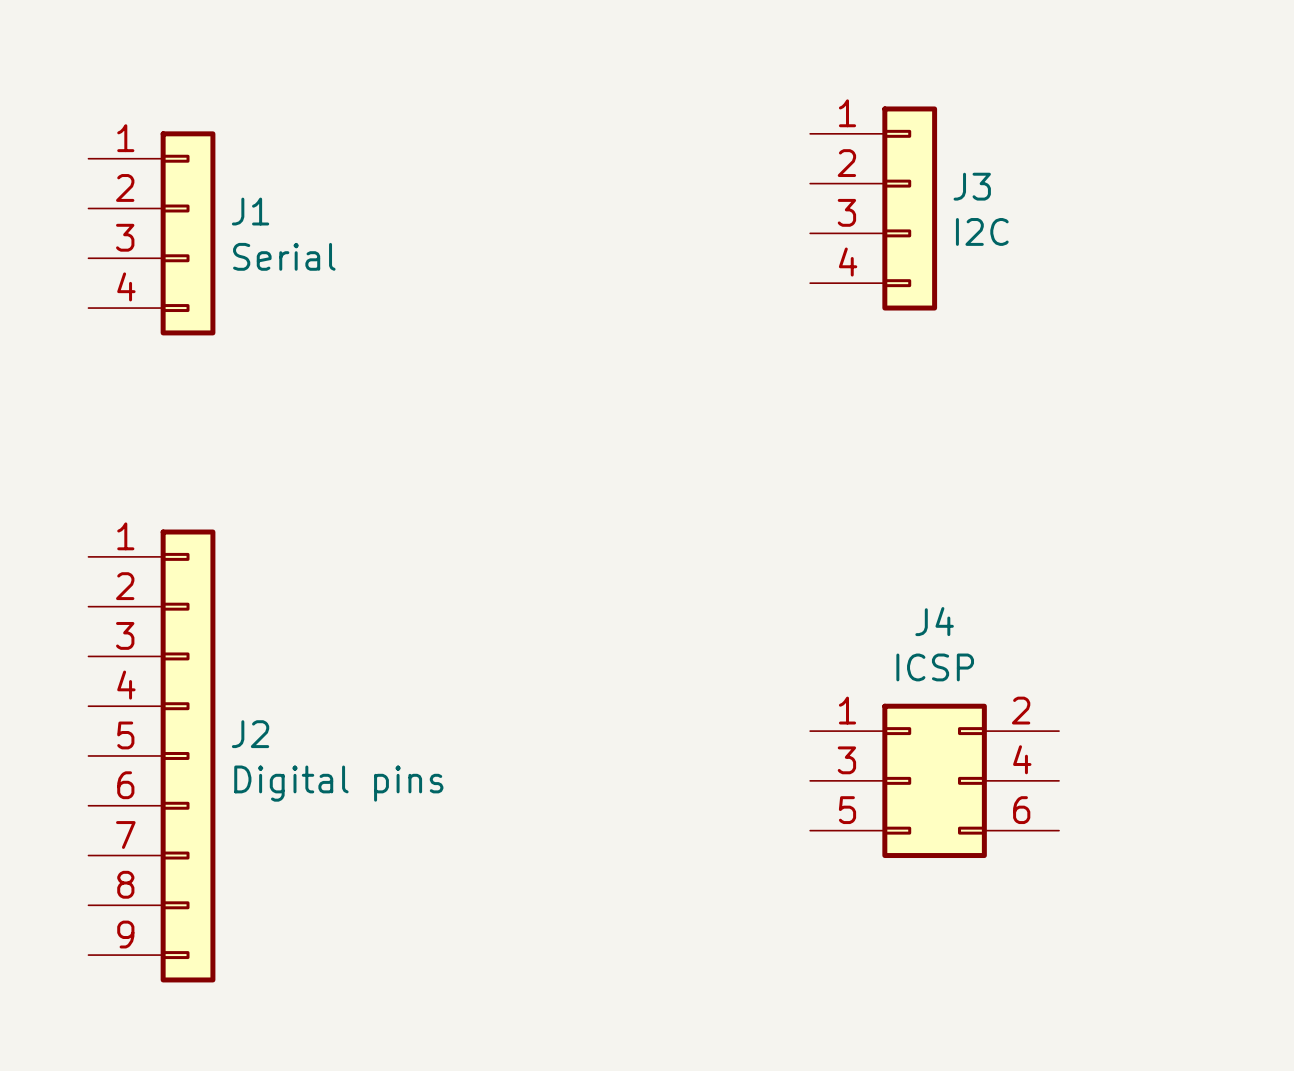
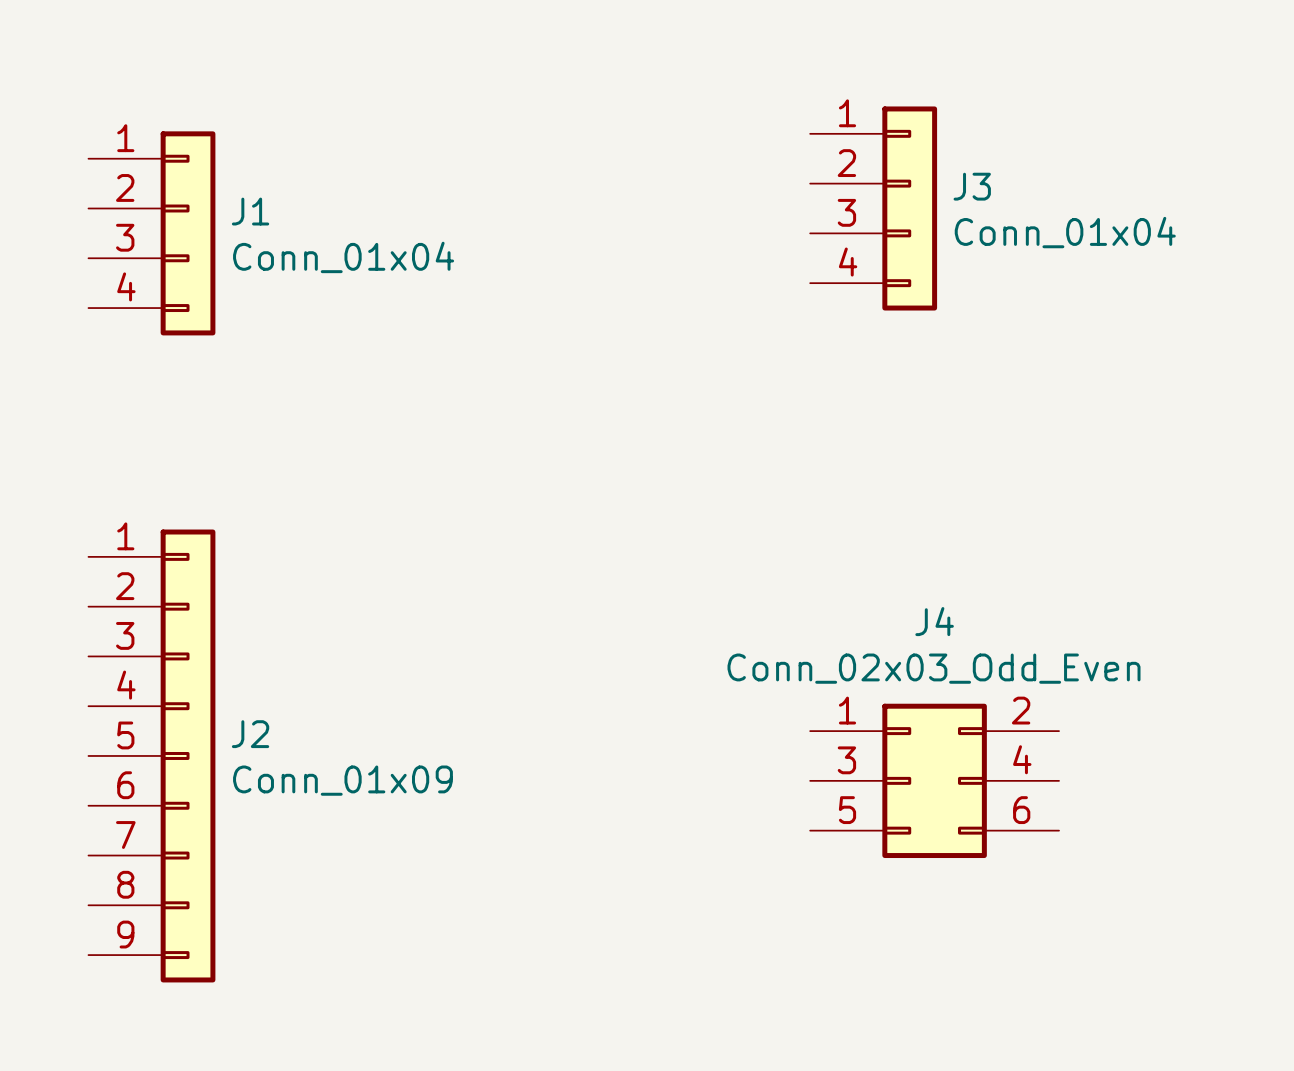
J3 value: I2C (982, 231) -> Conn_01x04 (1065, 232)
J1 value: Serial (284, 256) -> Conn_01x04 (343, 257)
J4 value: ICSP (935, 667) -> Conn_02x03_Odd_Even (934, 668)
J2 value: Digital pins (338, 783) -> Conn_01x09 (342, 780)

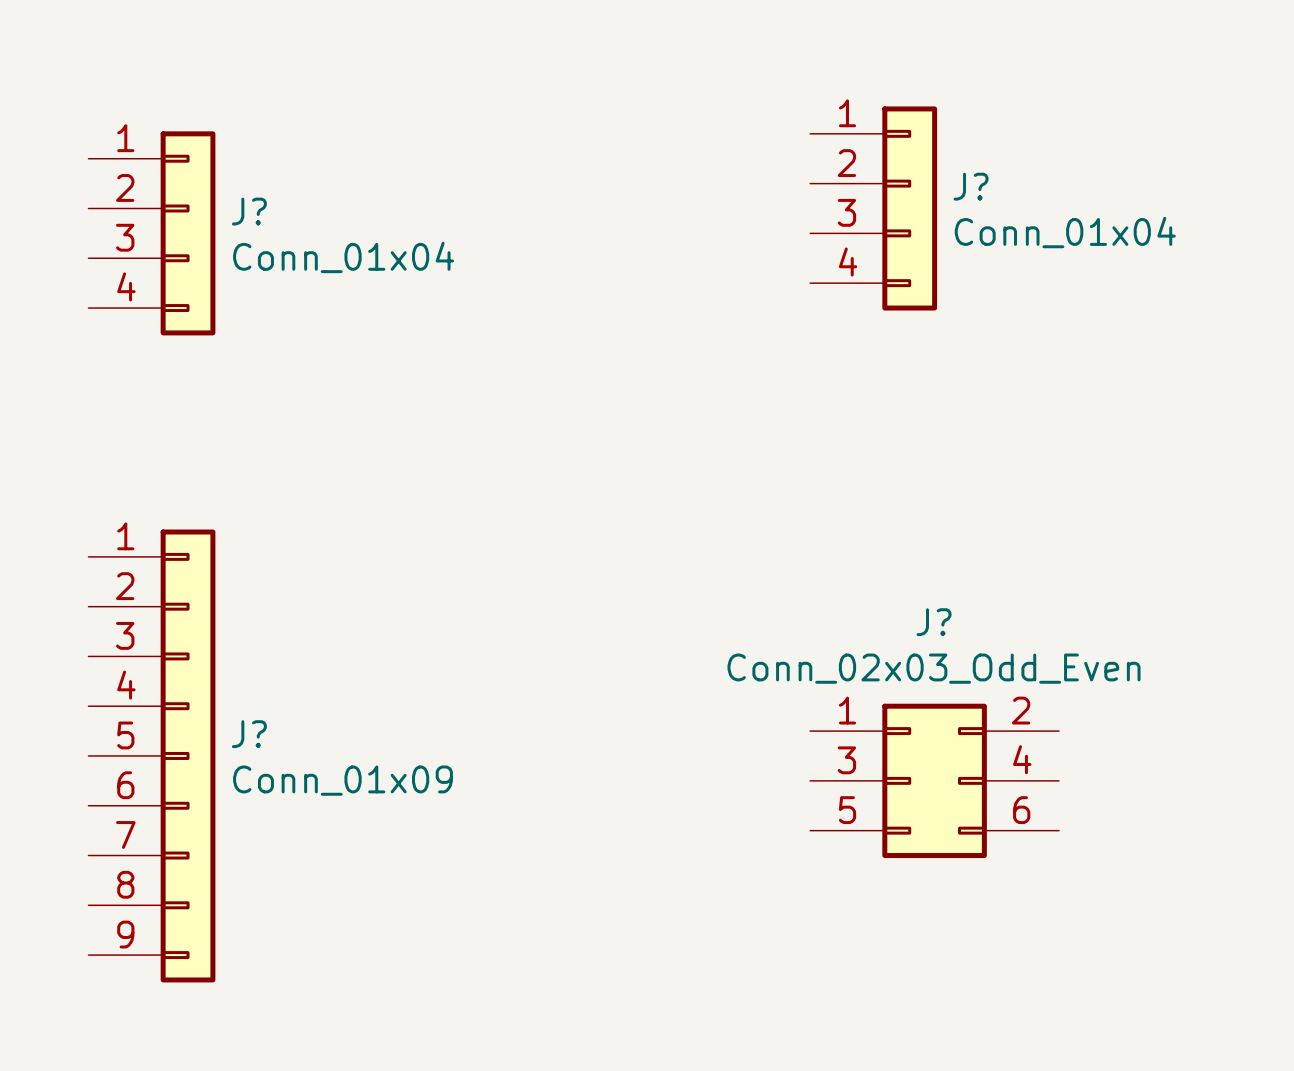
J3 name: J3 (972, 186) -> J? (971, 186)
J1 name: J1 (250, 211) -> J? (249, 211)
J4 name: J4 (934, 621) -> J? (934, 622)
J2 name: J2 (250, 734) -> J? (249, 734)

